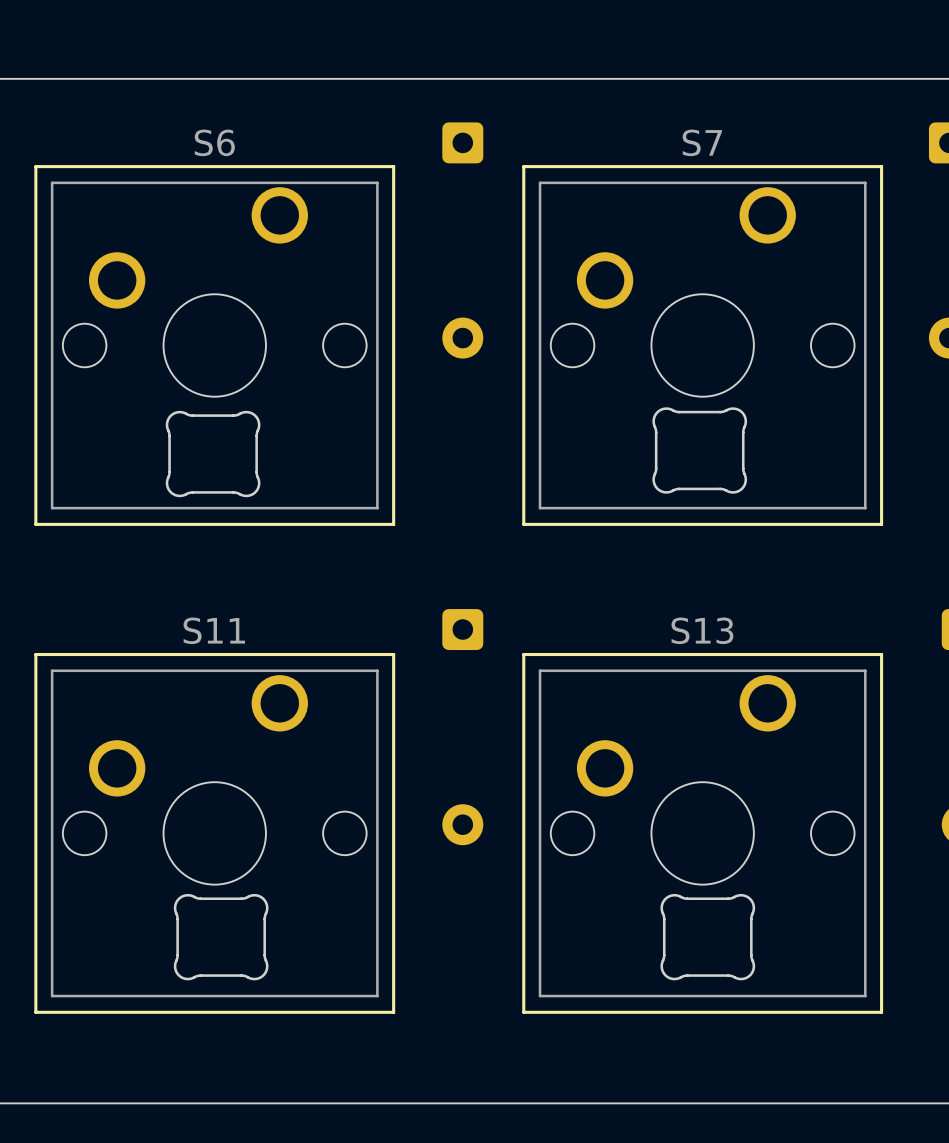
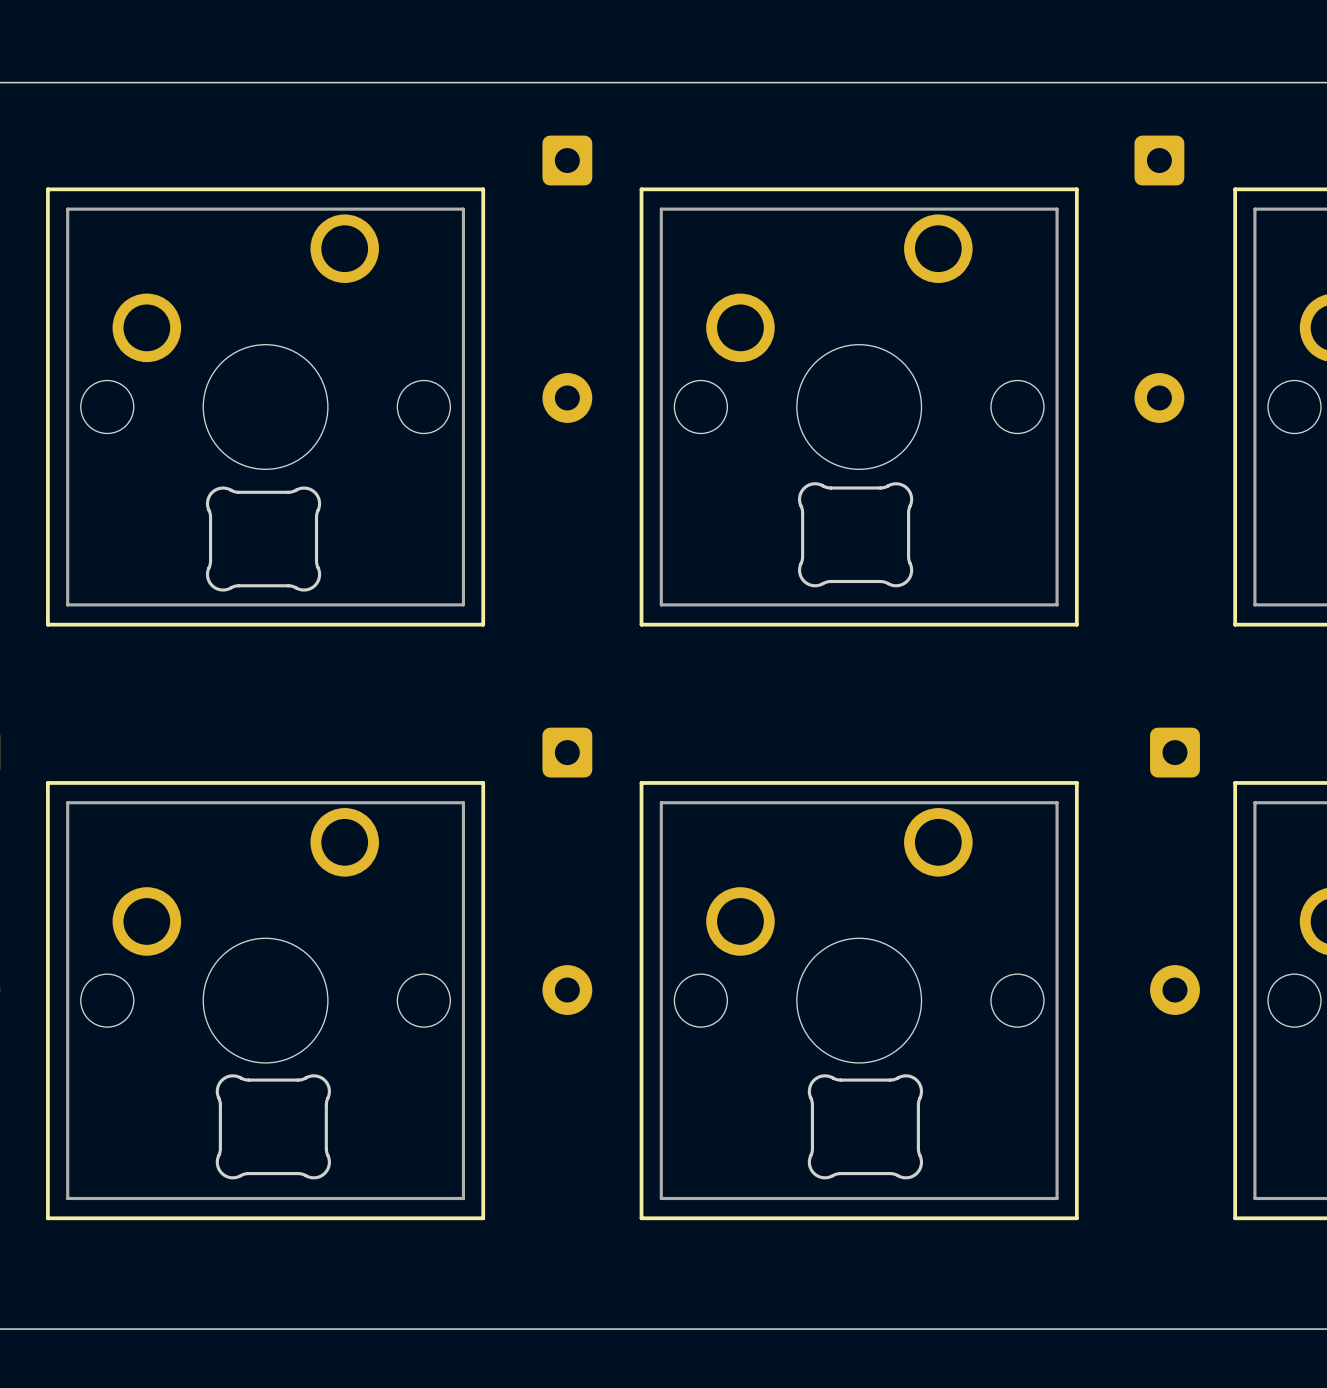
S6 name: S6 (214, 142) -> none
S7 name: S7 (702, 142) -> none
S11 name: S11 (214, 630) -> none
S13 name: S13 (702, 630) -> none

